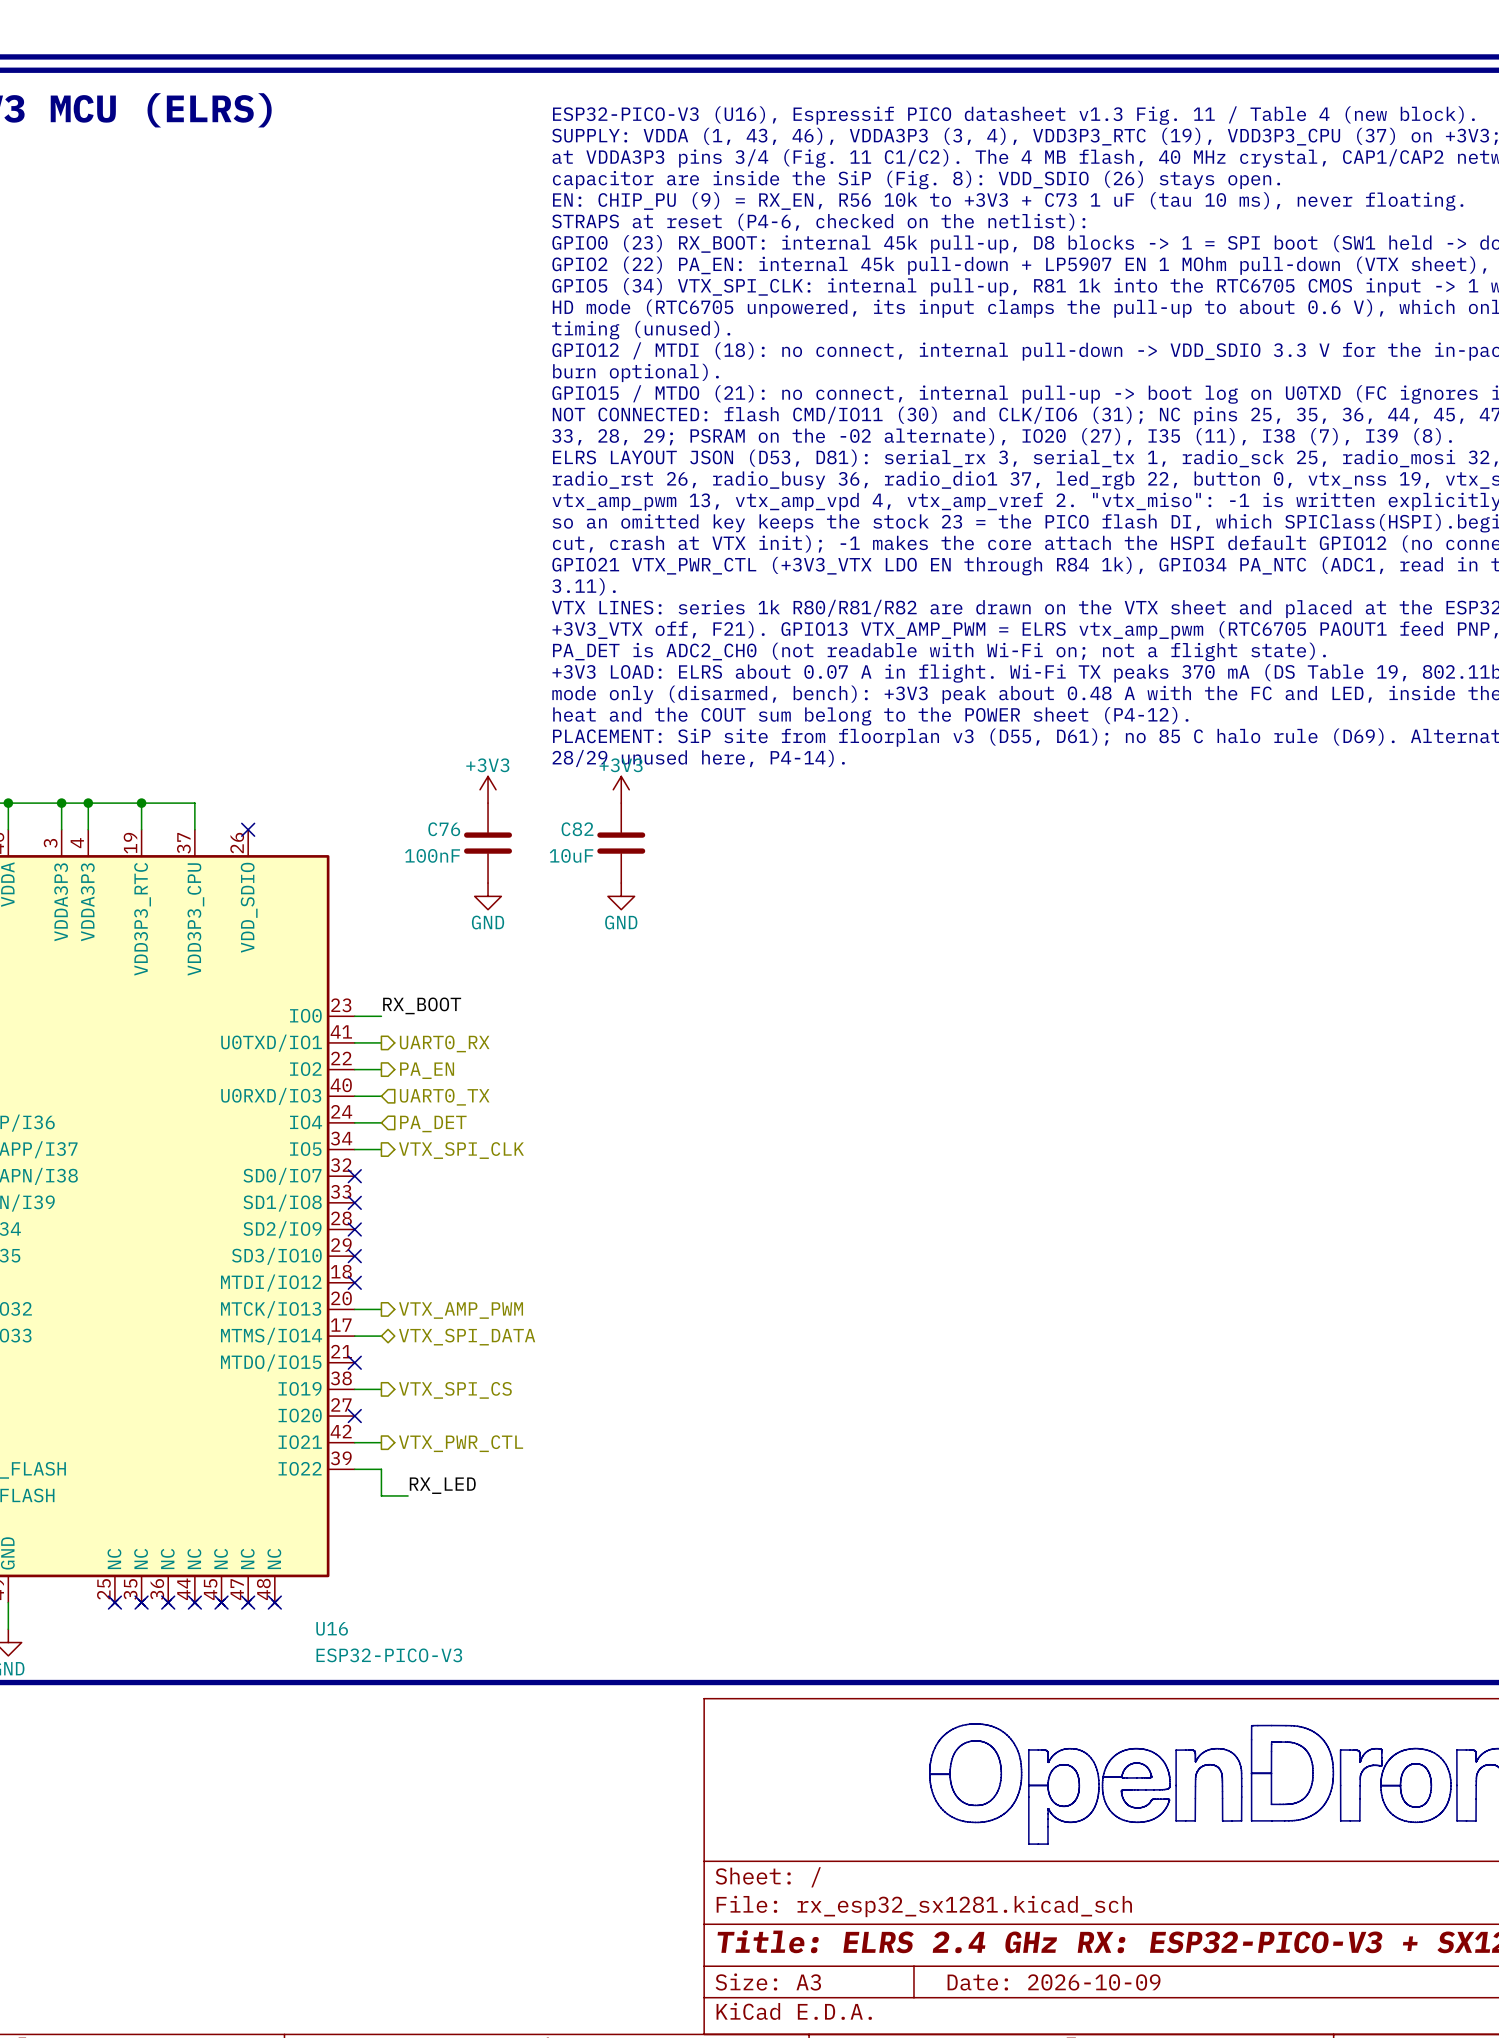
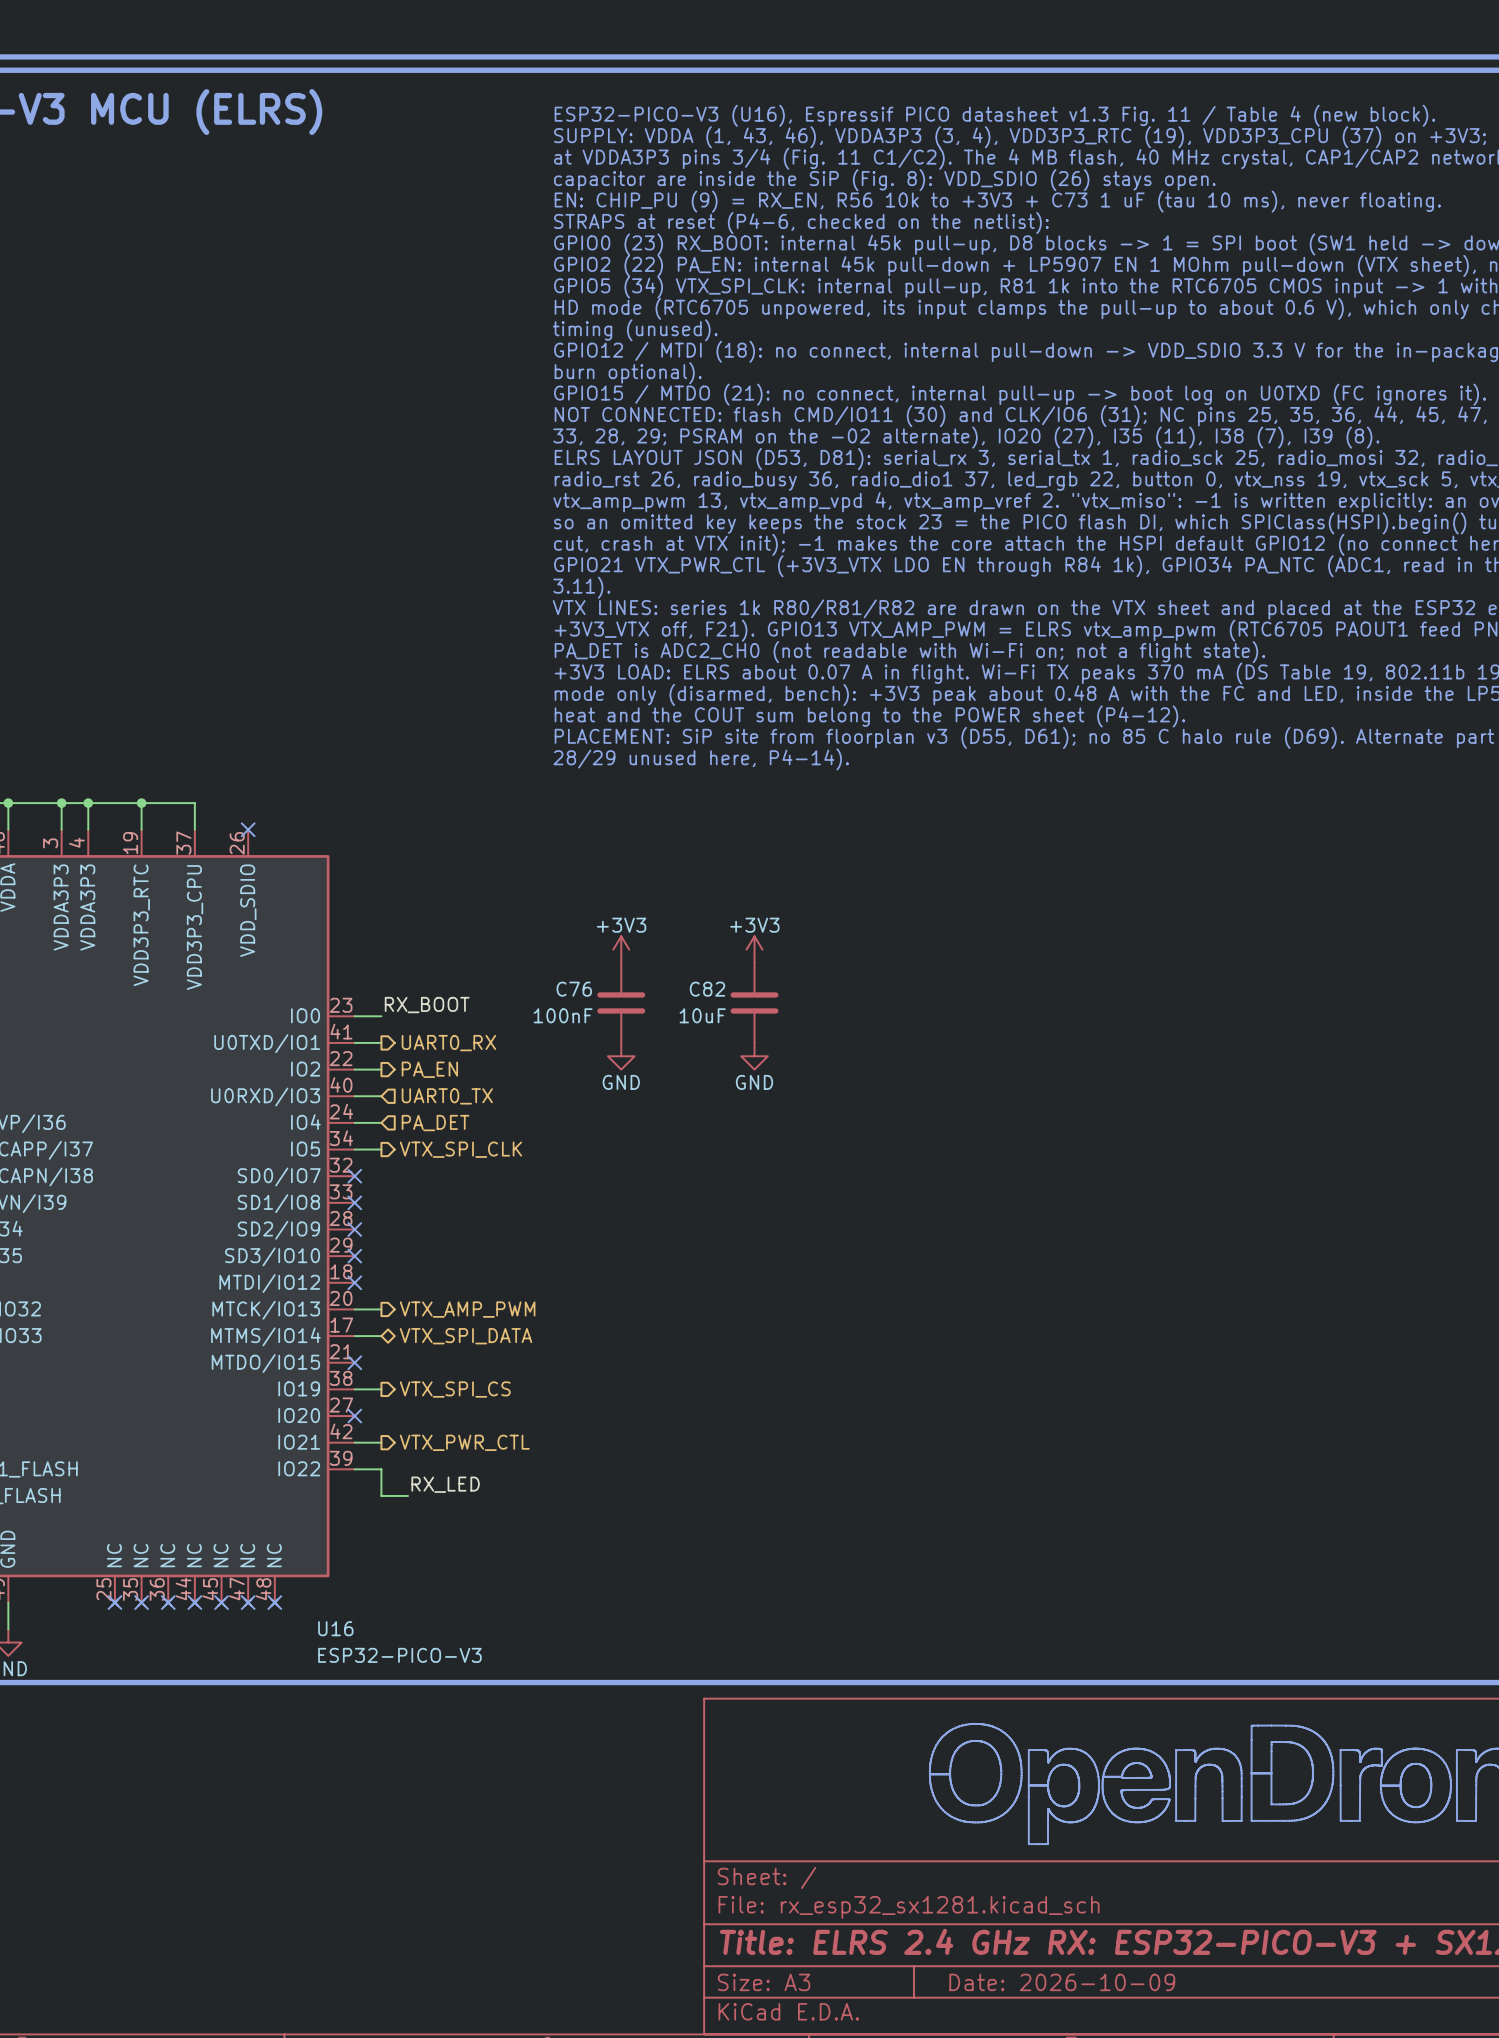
power symbol: +3V3 (488, 789) -> none
power symbol: +3V3 (621, 789) -> none
C76 position: (488, 843) -> (621, 1002)
C82 position: (621, 843) -> (754, 1002)
power symbol: GND (488, 896) -> none
power symbol: GND (621, 896) -> none
power symbol: none -> +3V3 (621, 949)
power symbol: none -> +3V3 (754, 949)
power symbol: none -> GND (621, 1056)
power symbol: none -> GND (754, 1056)

